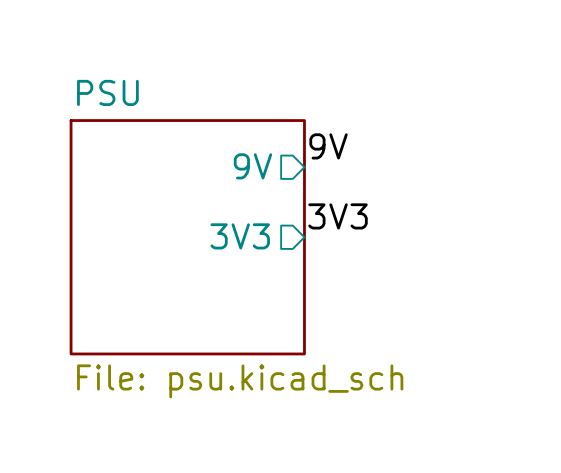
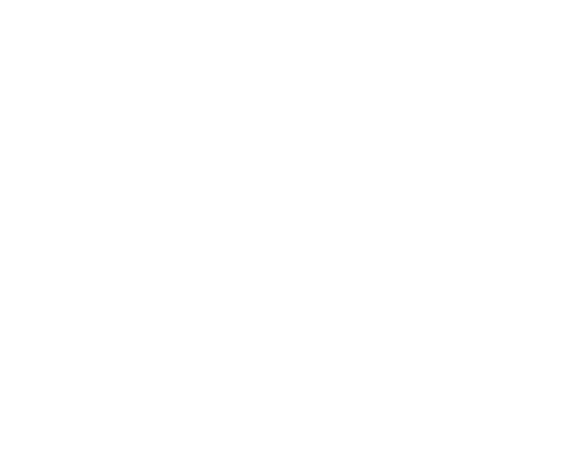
label: 9V (328, 146) -> none
sheet pin: 9V (252, 166) -> none
label: 3V3 (337, 216) -> none
sheet pin: 3V3 (240, 236) -> none
sheet PSU: File: psu.kicad_sch (187, 237) -> none

